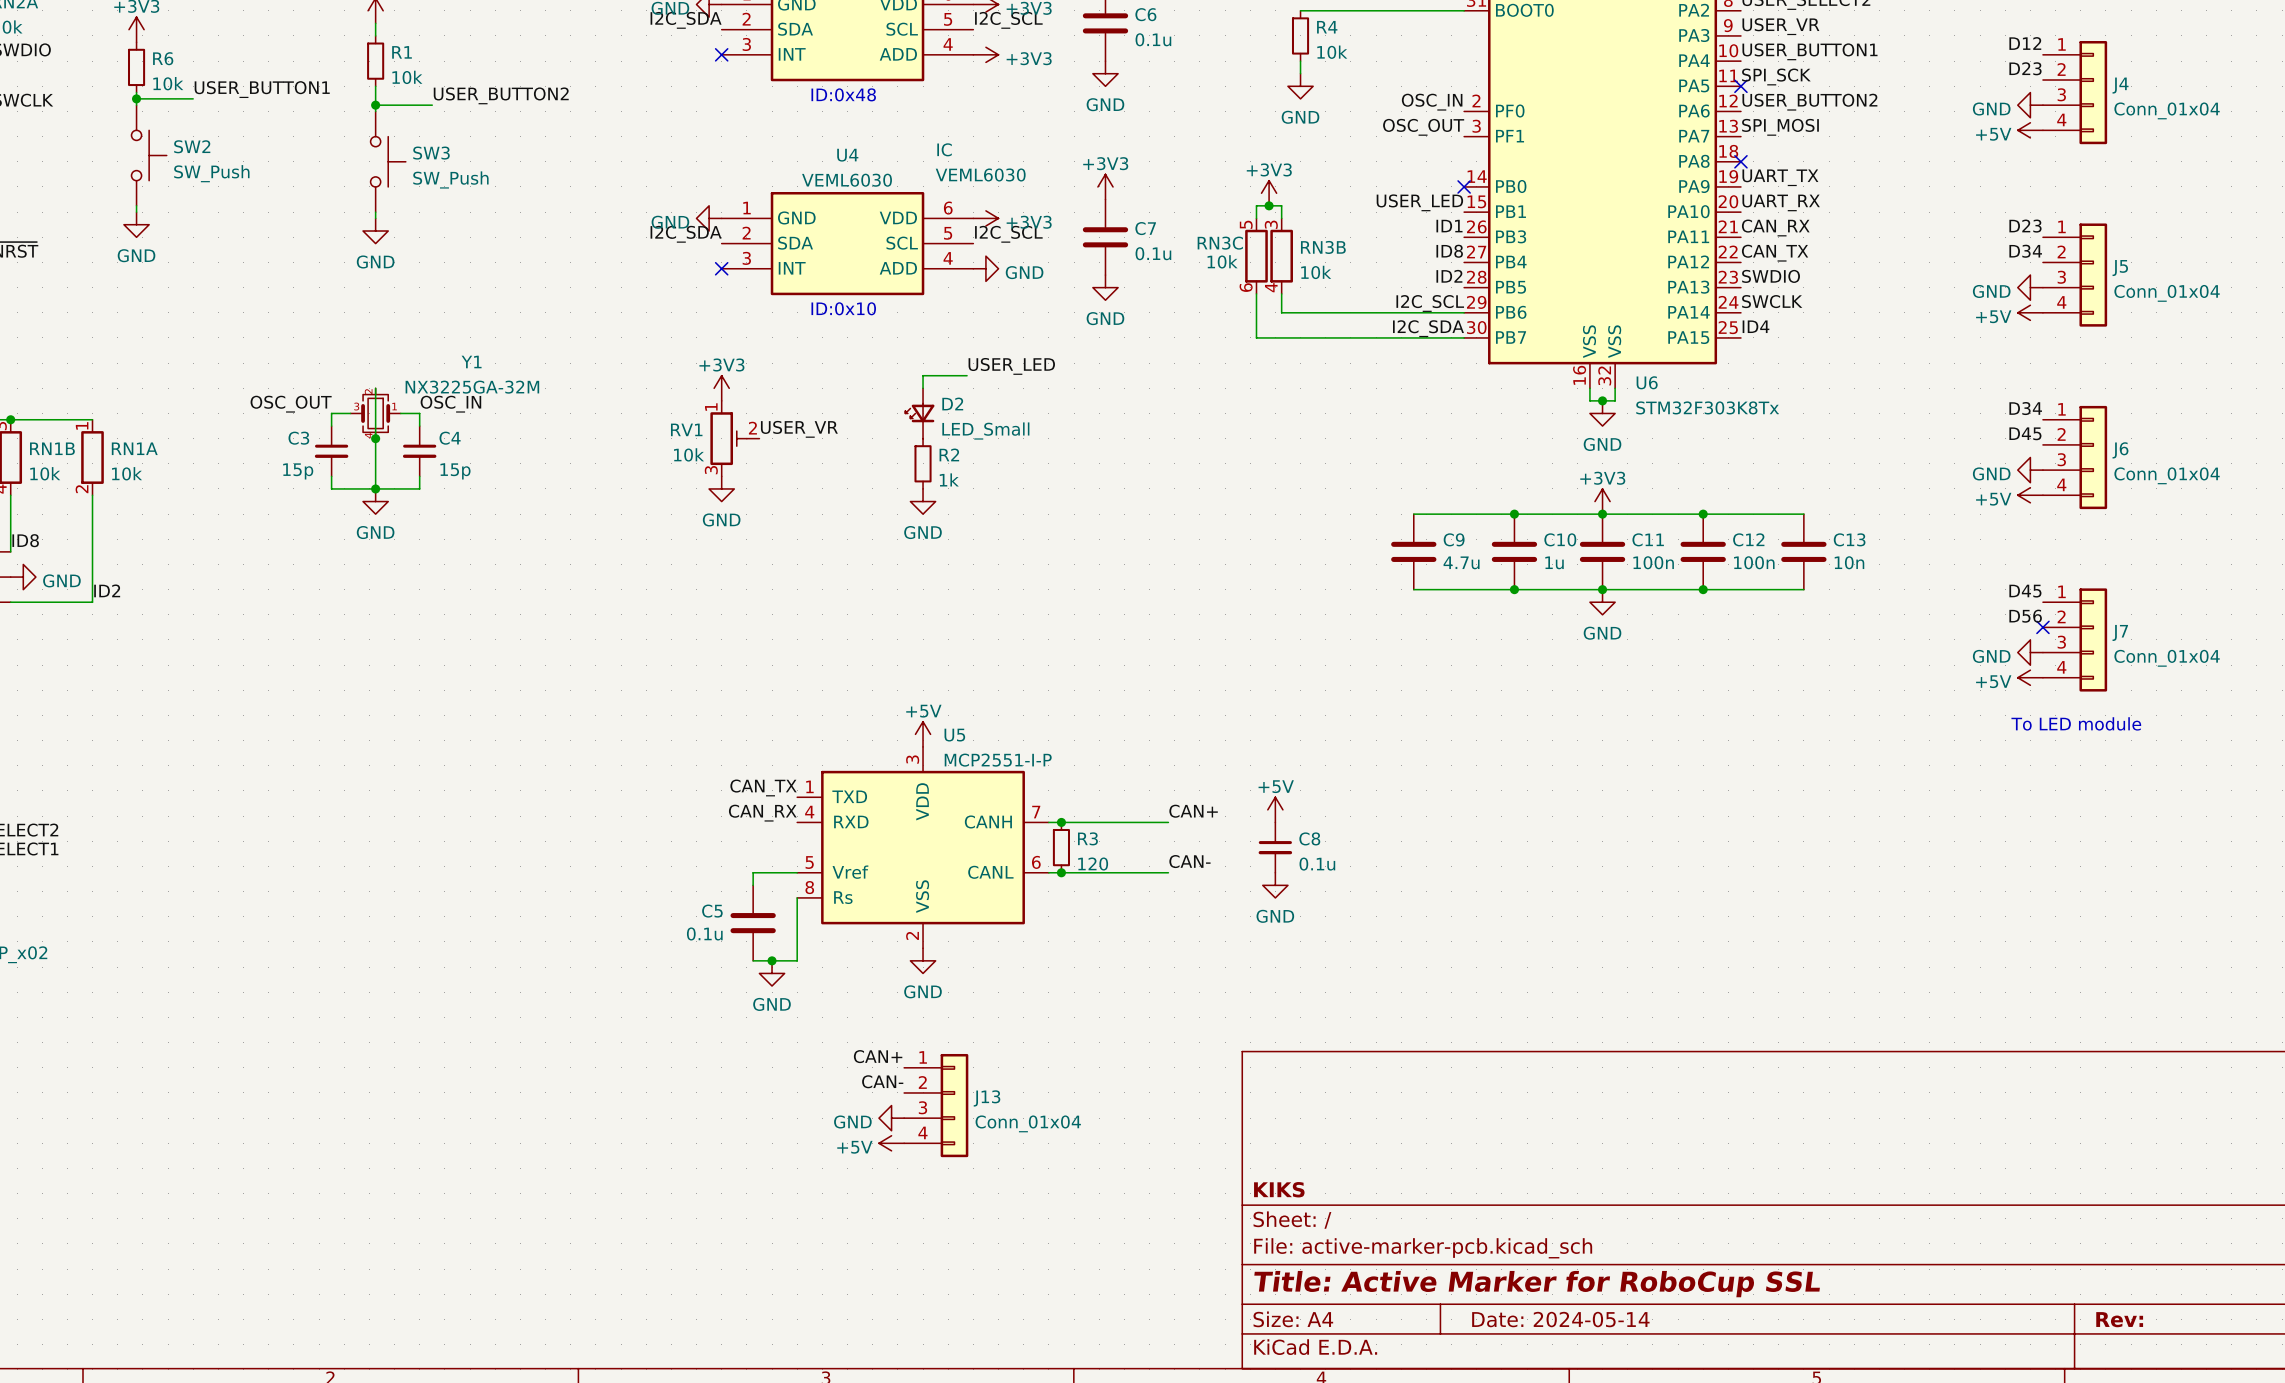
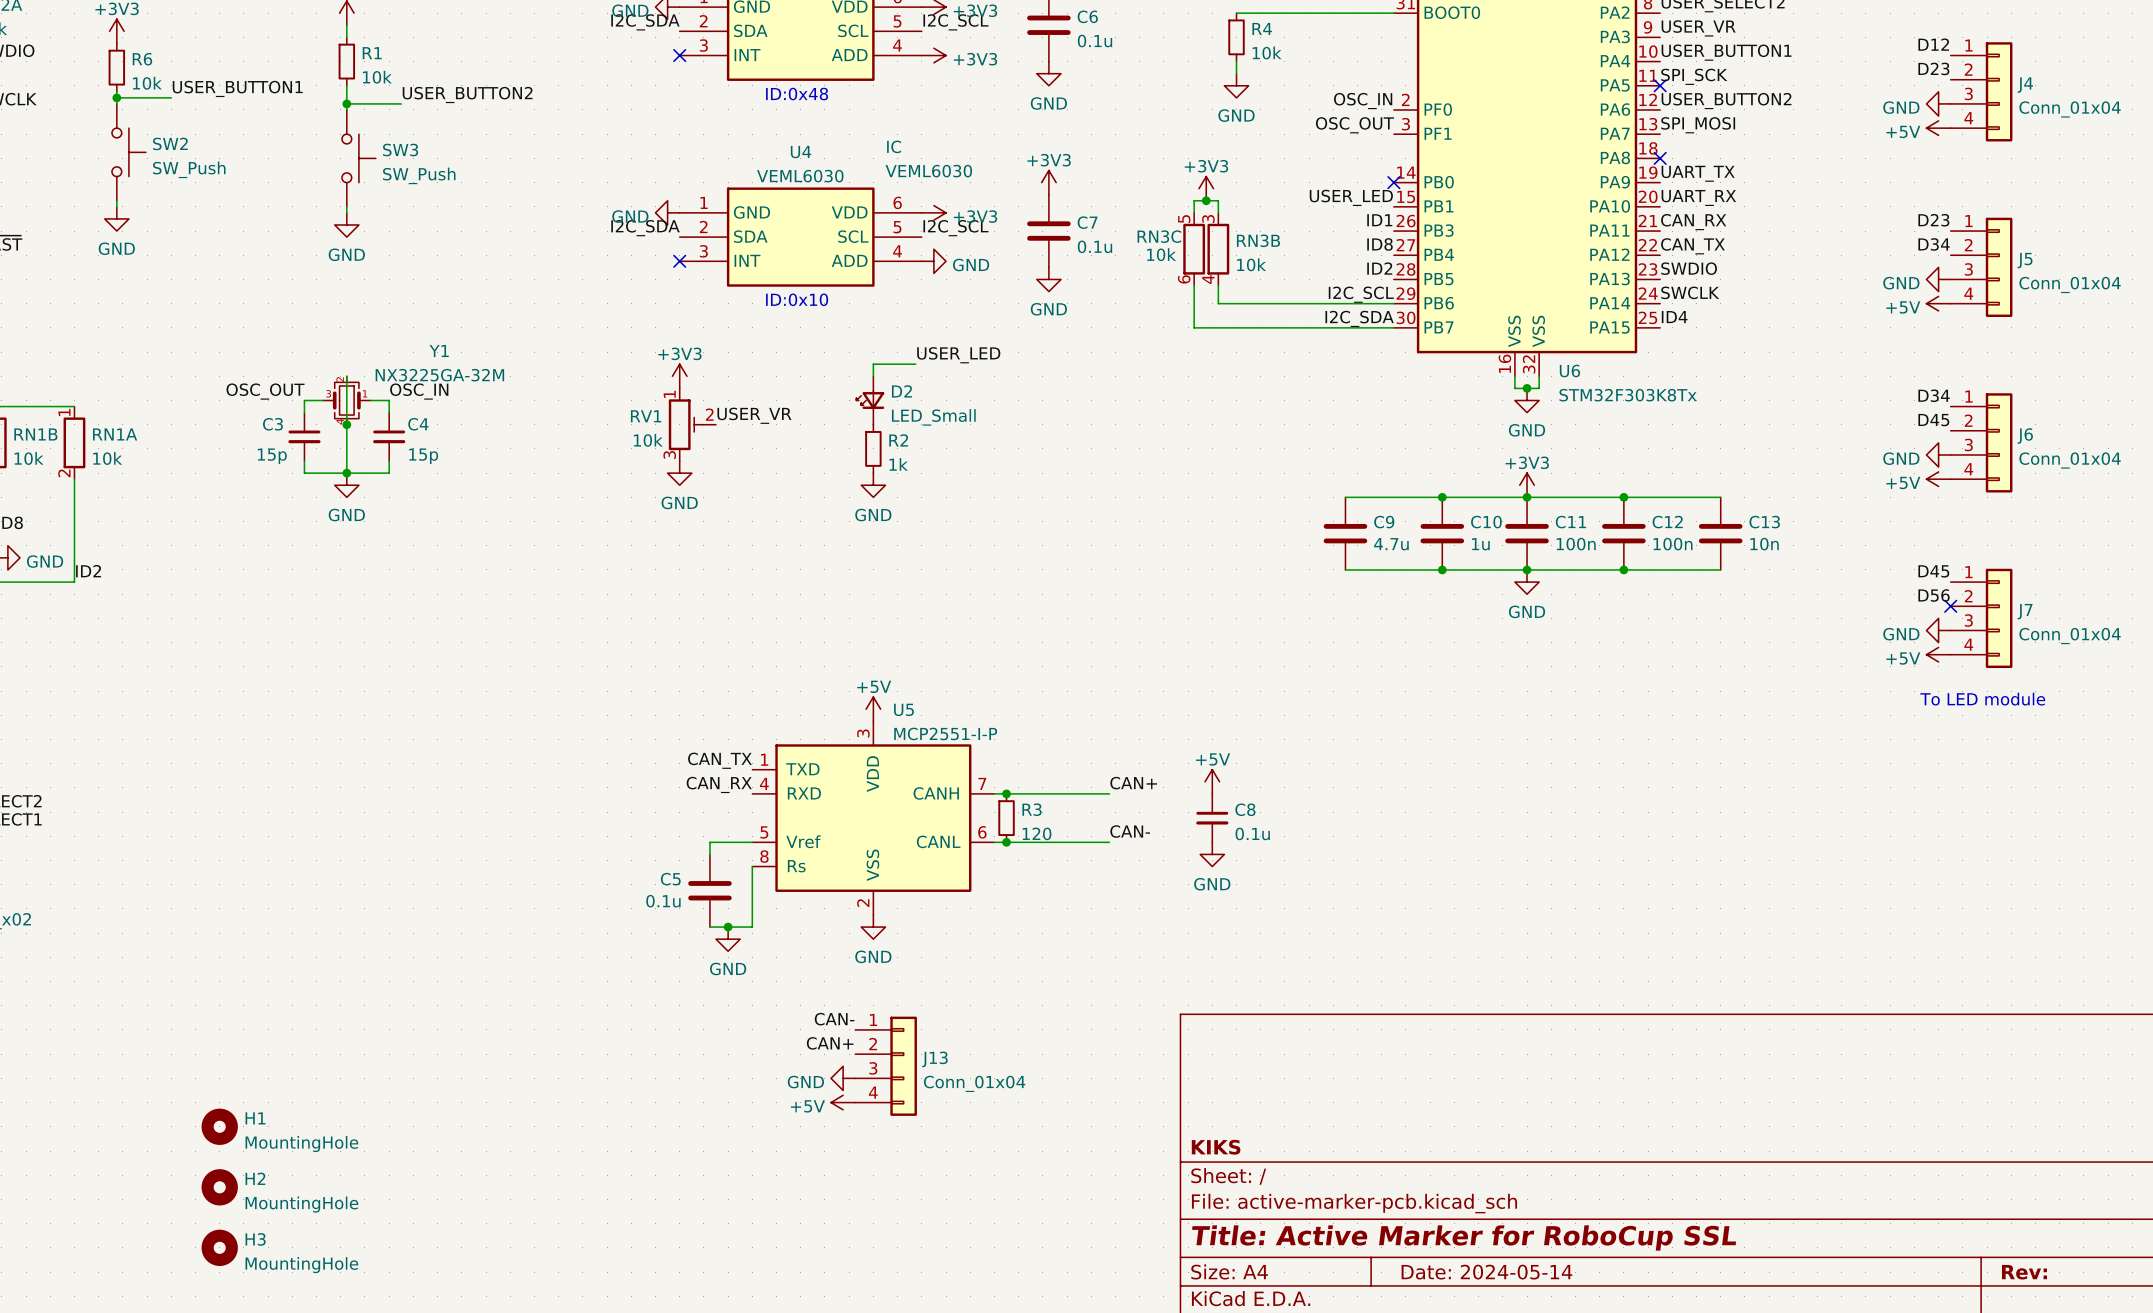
label: CAN+ (878, 1056) -> CAN- (834, 1019)
label: CAN- (882, 1081) -> CAN+ (830, 1043)
H1: none -> MountingHole (219, 1126)
H2: none -> MountingHole (219, 1187)
H3: none -> MountingHole (219, 1247)

